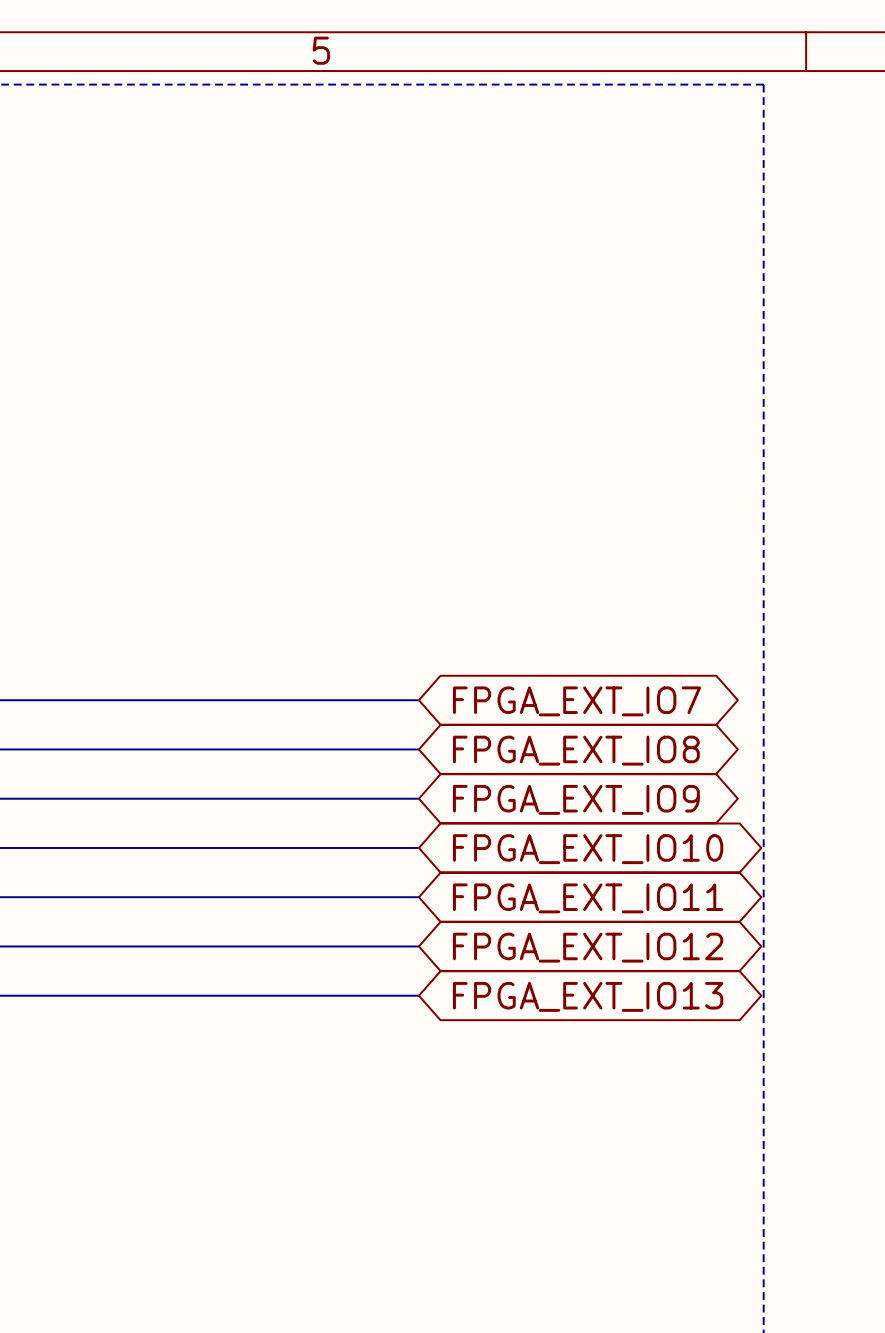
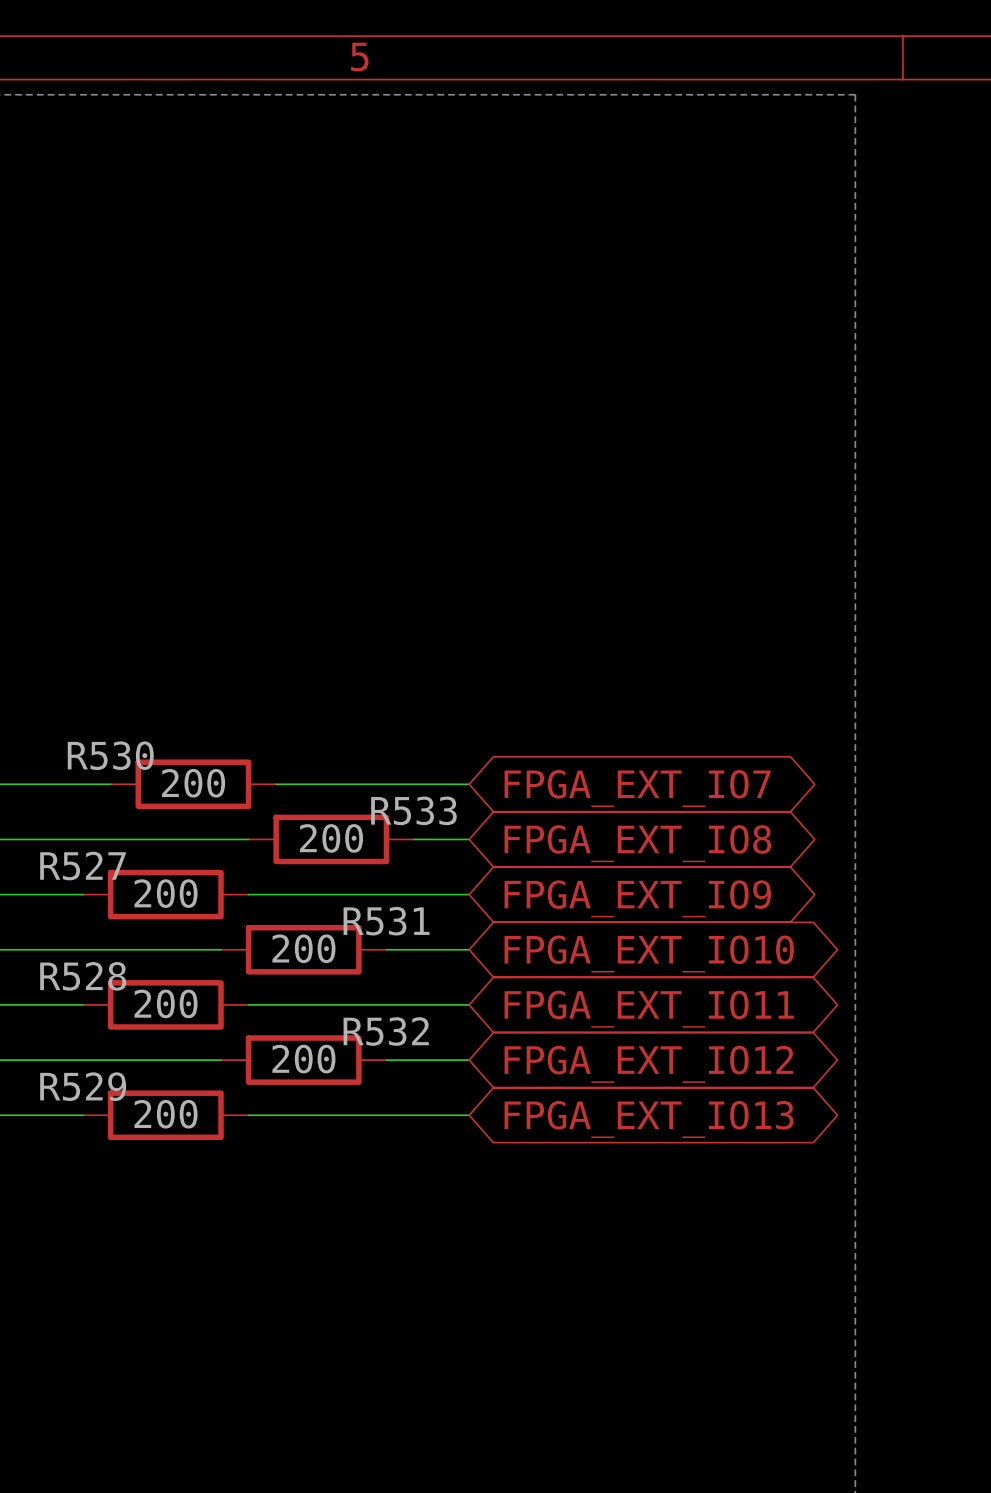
wire: (98, 700) (246, 700) -> none
R530: none -> 200 (193, 784)
wire: (221, 749) (369, 749) -> none
R533: none -> 200 (331, 839)
wire: (74, 798) (221, 798) -> none
R527: none -> 200 (165, 894)
wire: (197, 847) (345, 847) -> none
R531: none -> 200 (303, 949)
wire: (74, 897) (221, 897) -> none
R528: none -> 200 (165, 1004)
wire: (197, 946) (345, 946) -> none
R532: none -> 200 (303, 1060)
wire: (74, 995) (221, 995) -> none
R529: none -> 200 (165, 1115)

